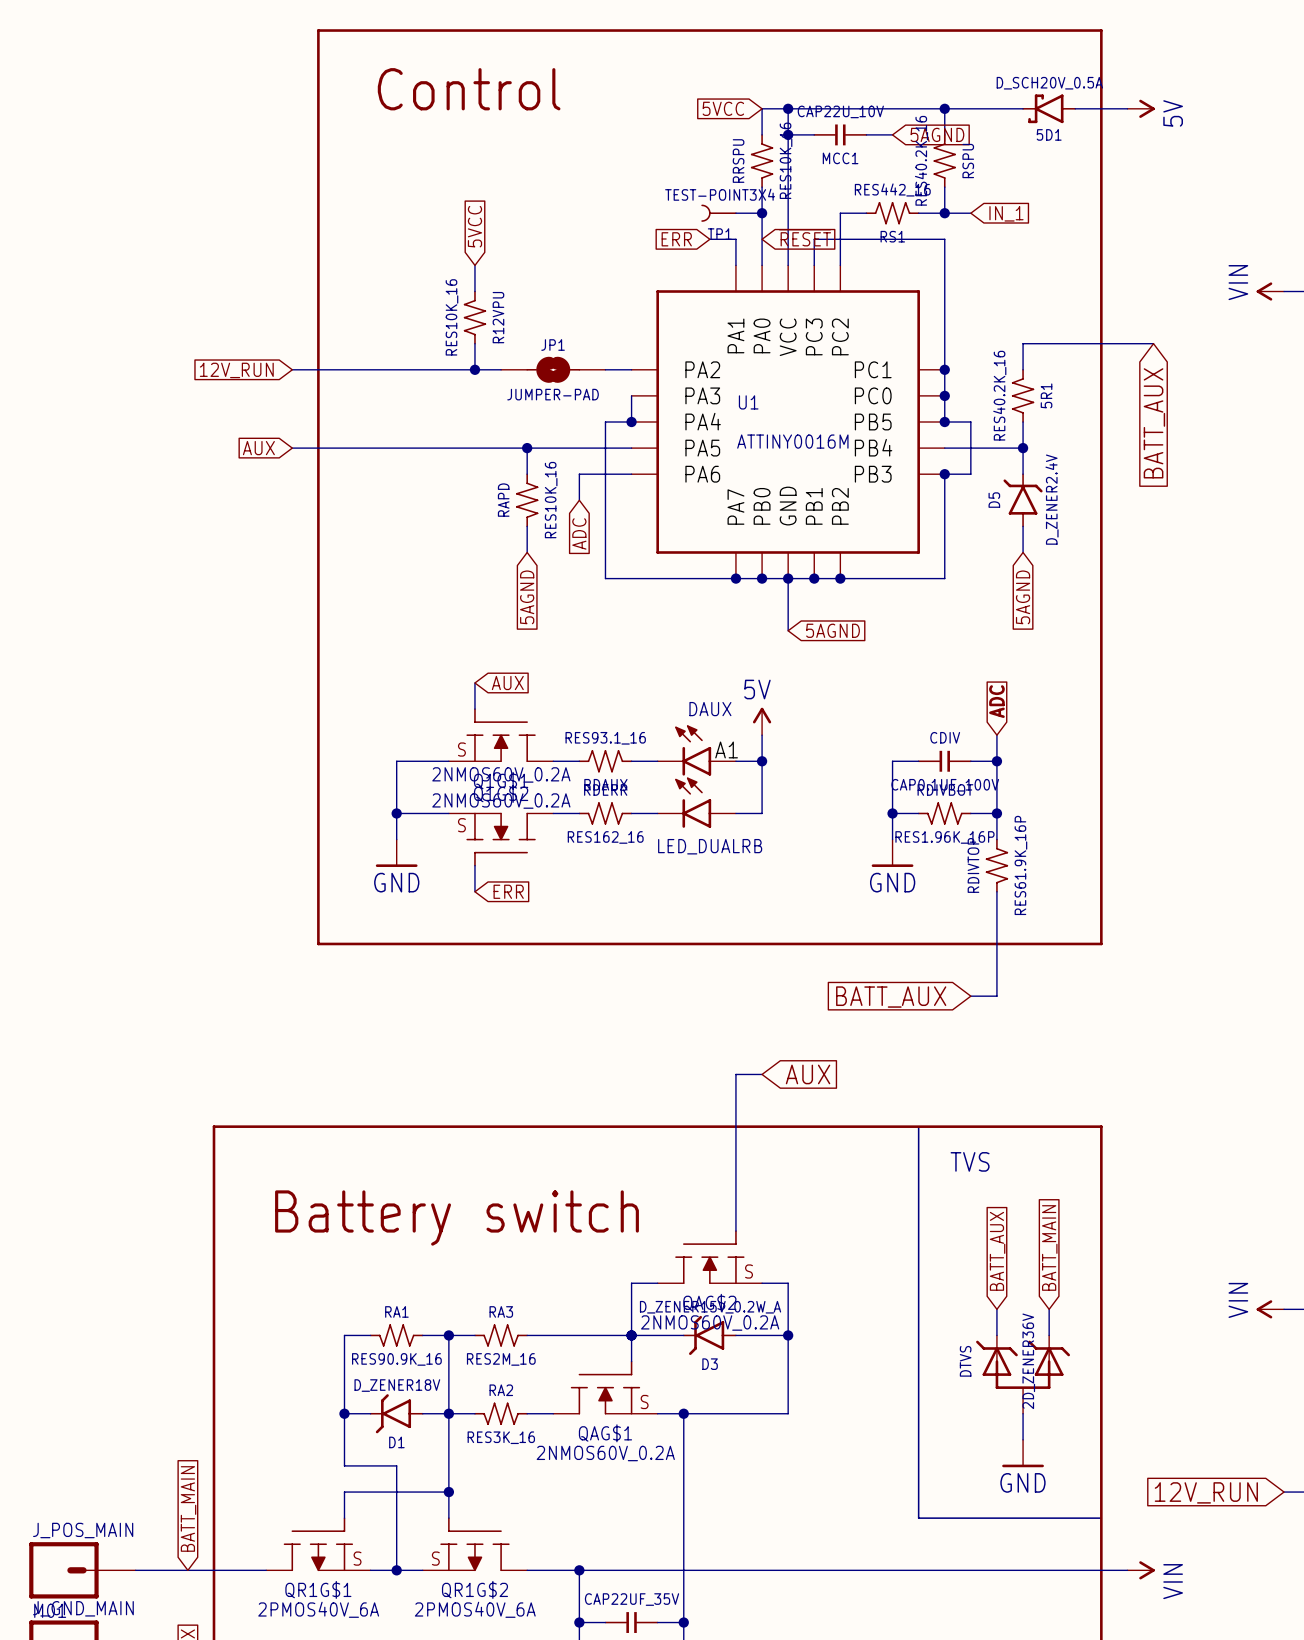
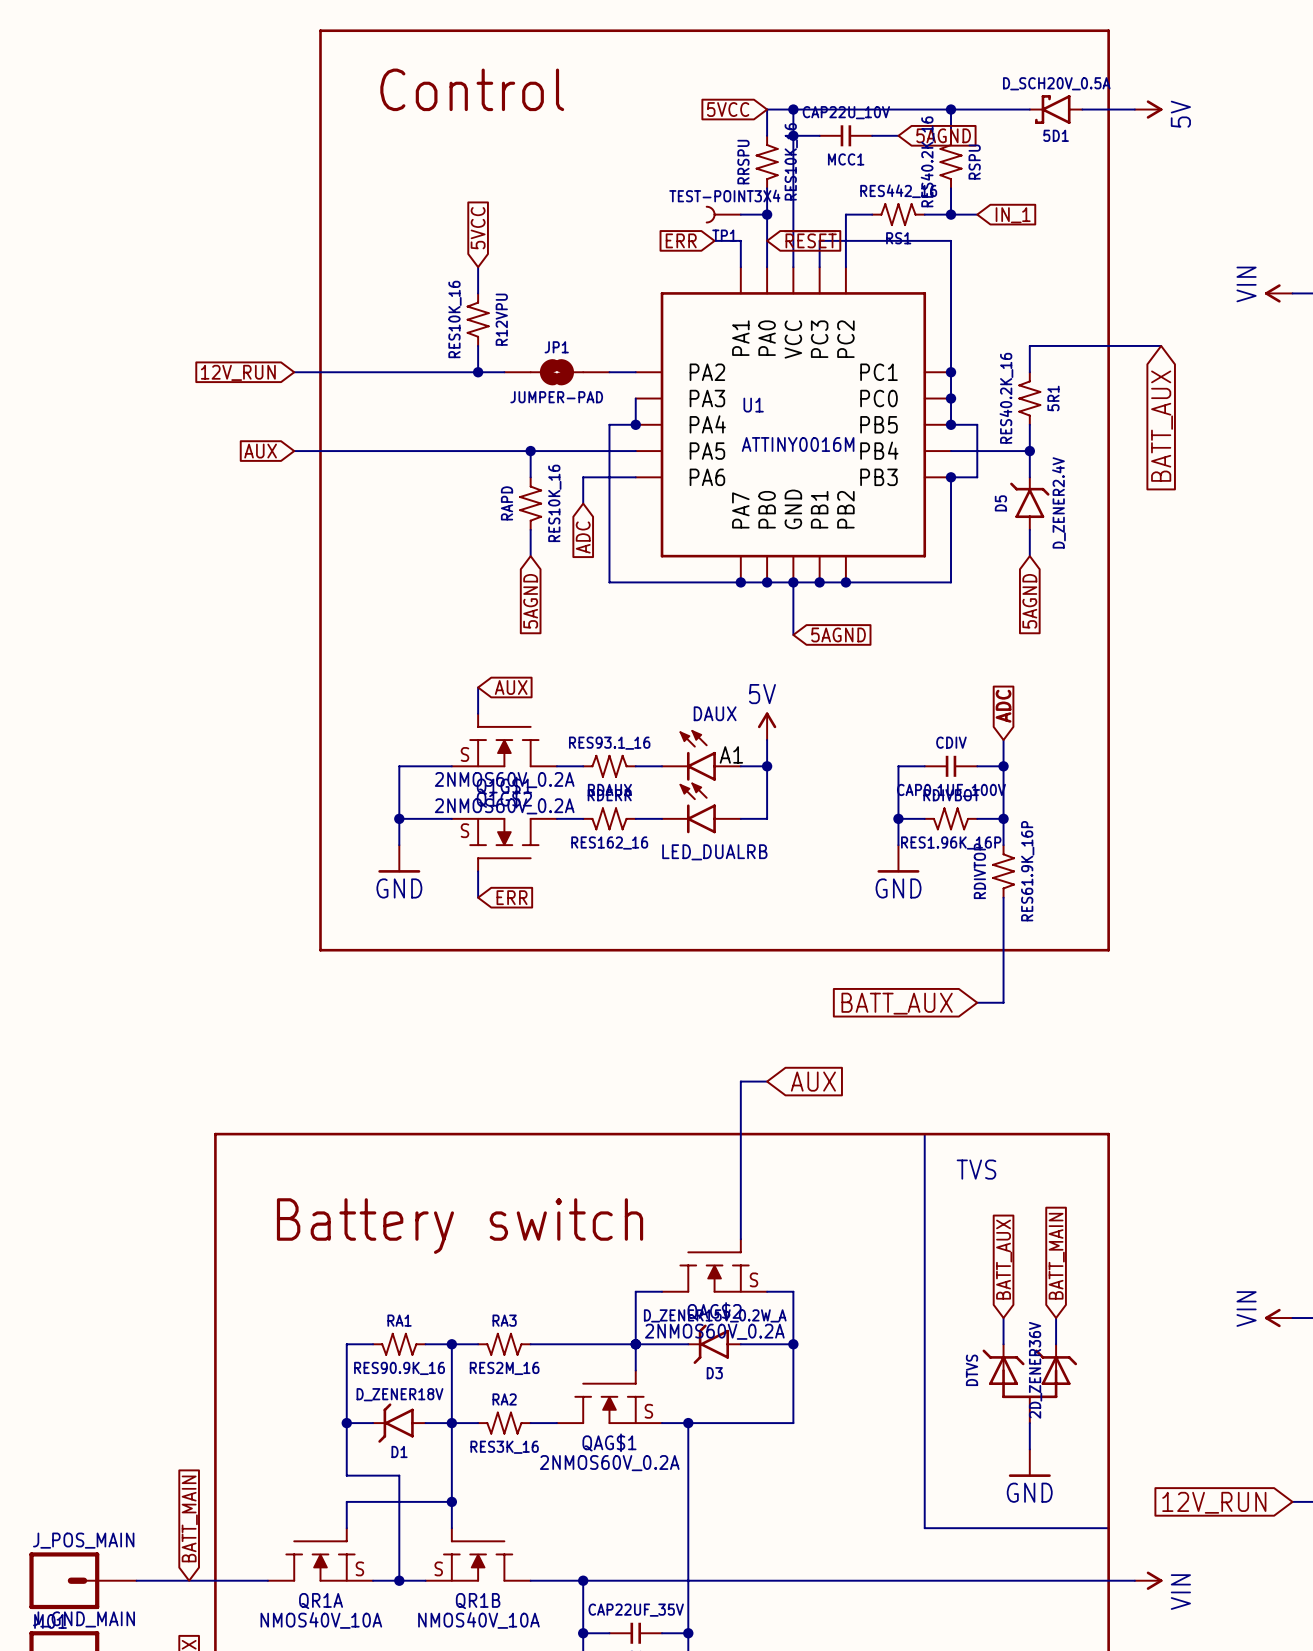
QR1G$1: 2PMOS40V_6A (318, 1544) -> none
QR1A: none -> NMOS40V_10A (320, 1554)
QR1G$2: 2PMOS40V_6A (474, 1544) -> none
QR1B: none -> NMOS40V_10A (478, 1554)

